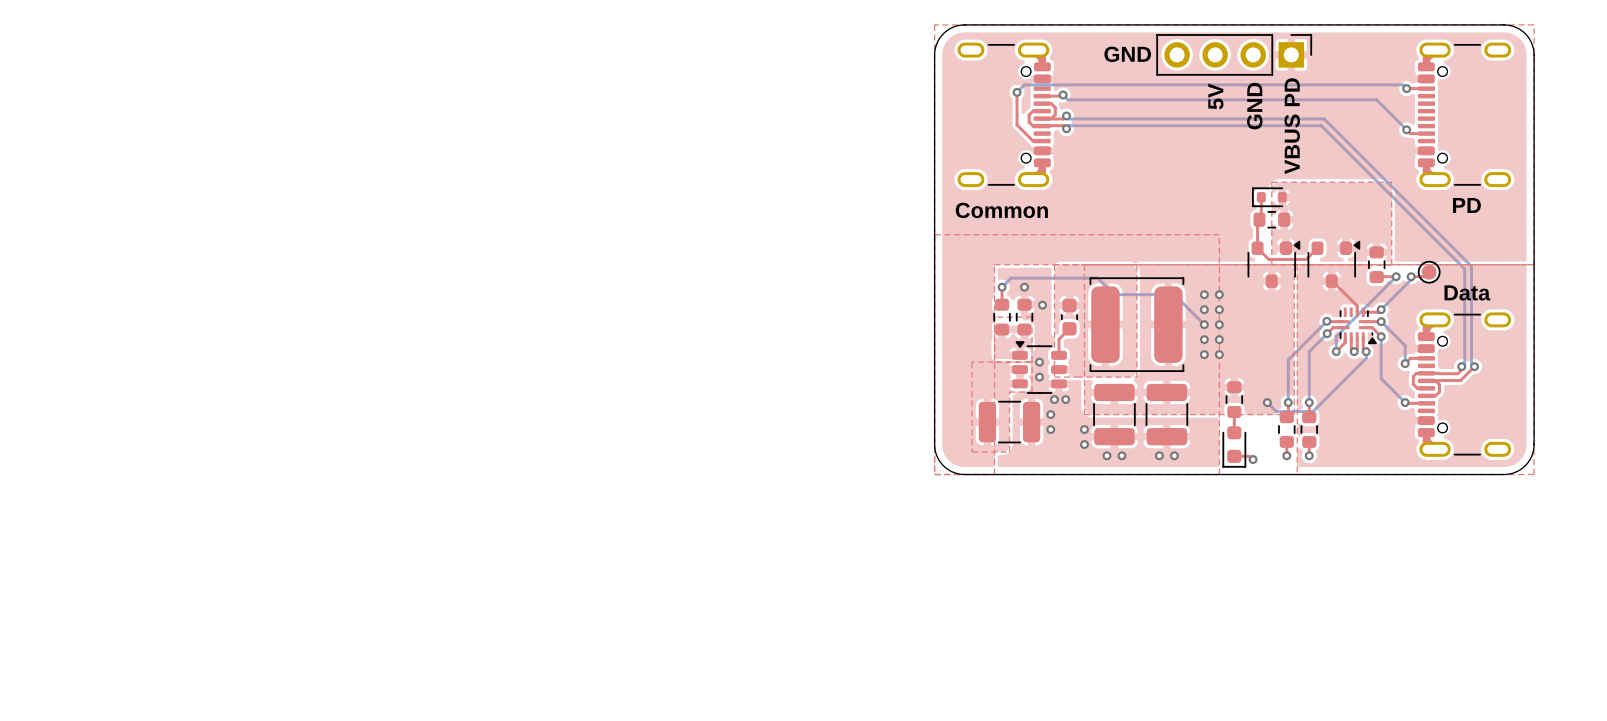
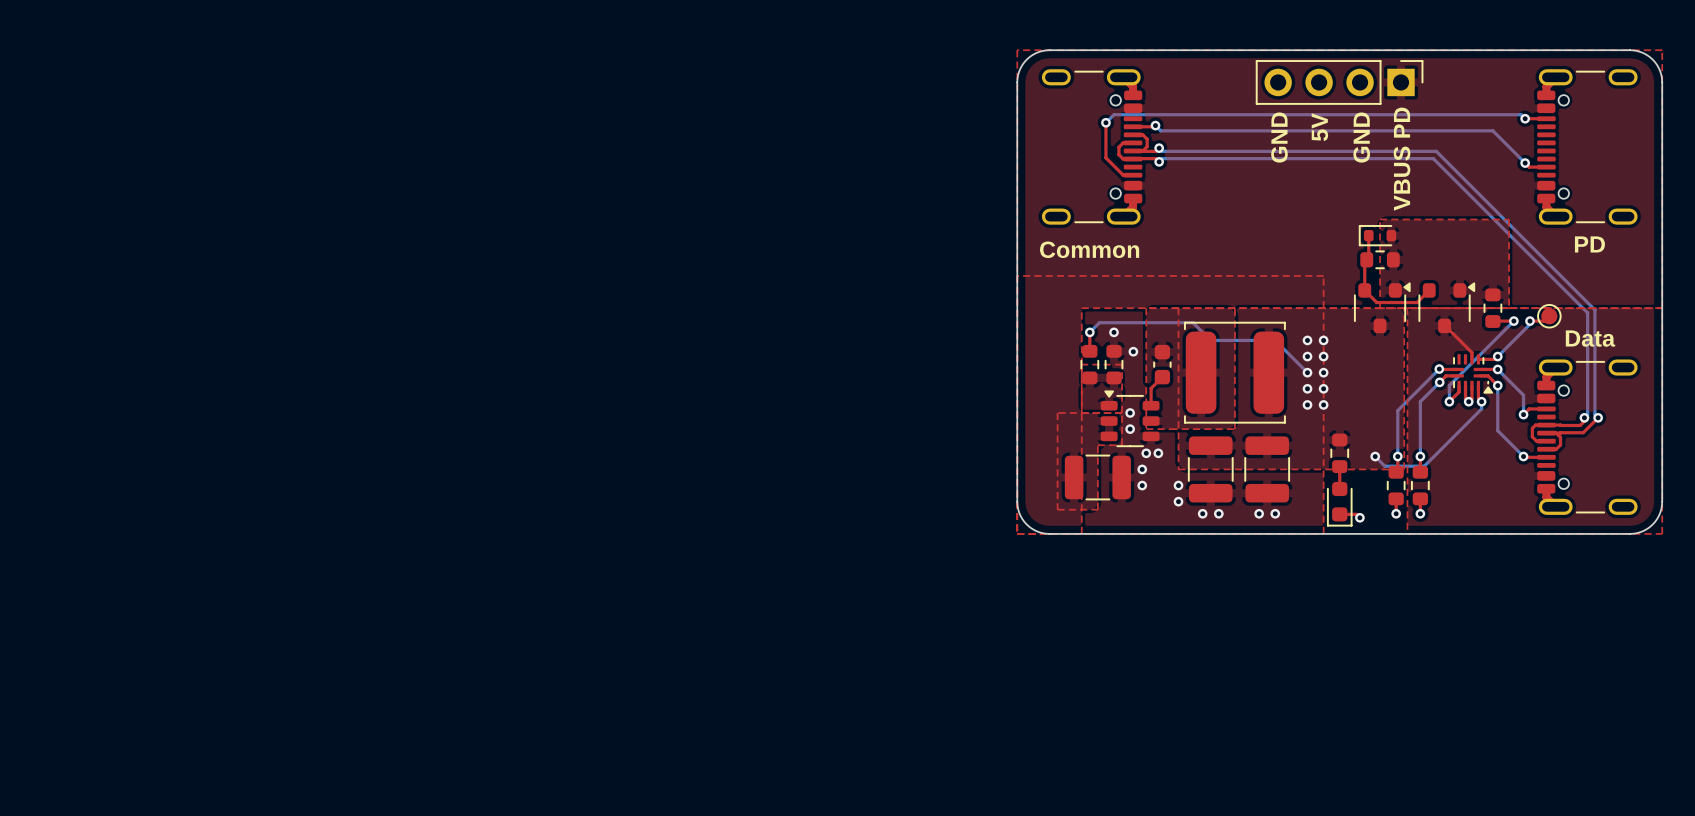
text rotation: 0° (1127, 54) -> 90° counterclockwise (1279, 137)
text position: GND (1127, 54) -> GND (1279, 137)

